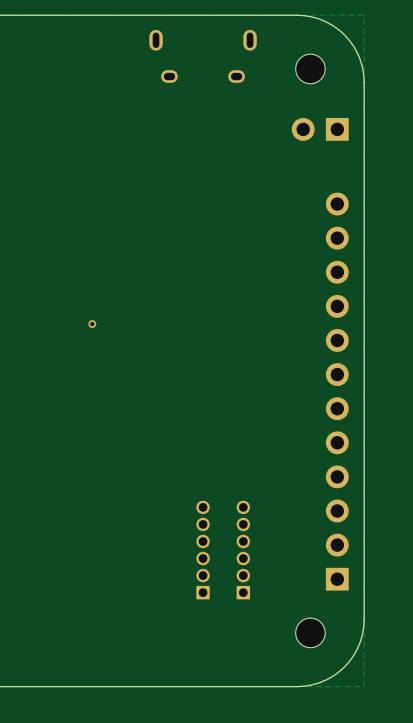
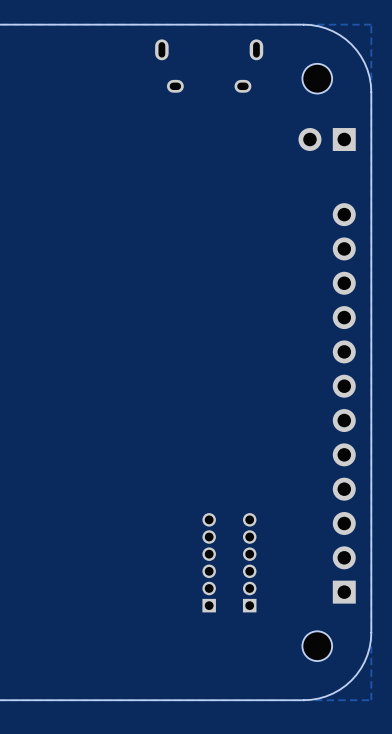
via: (92, 324) -> none

